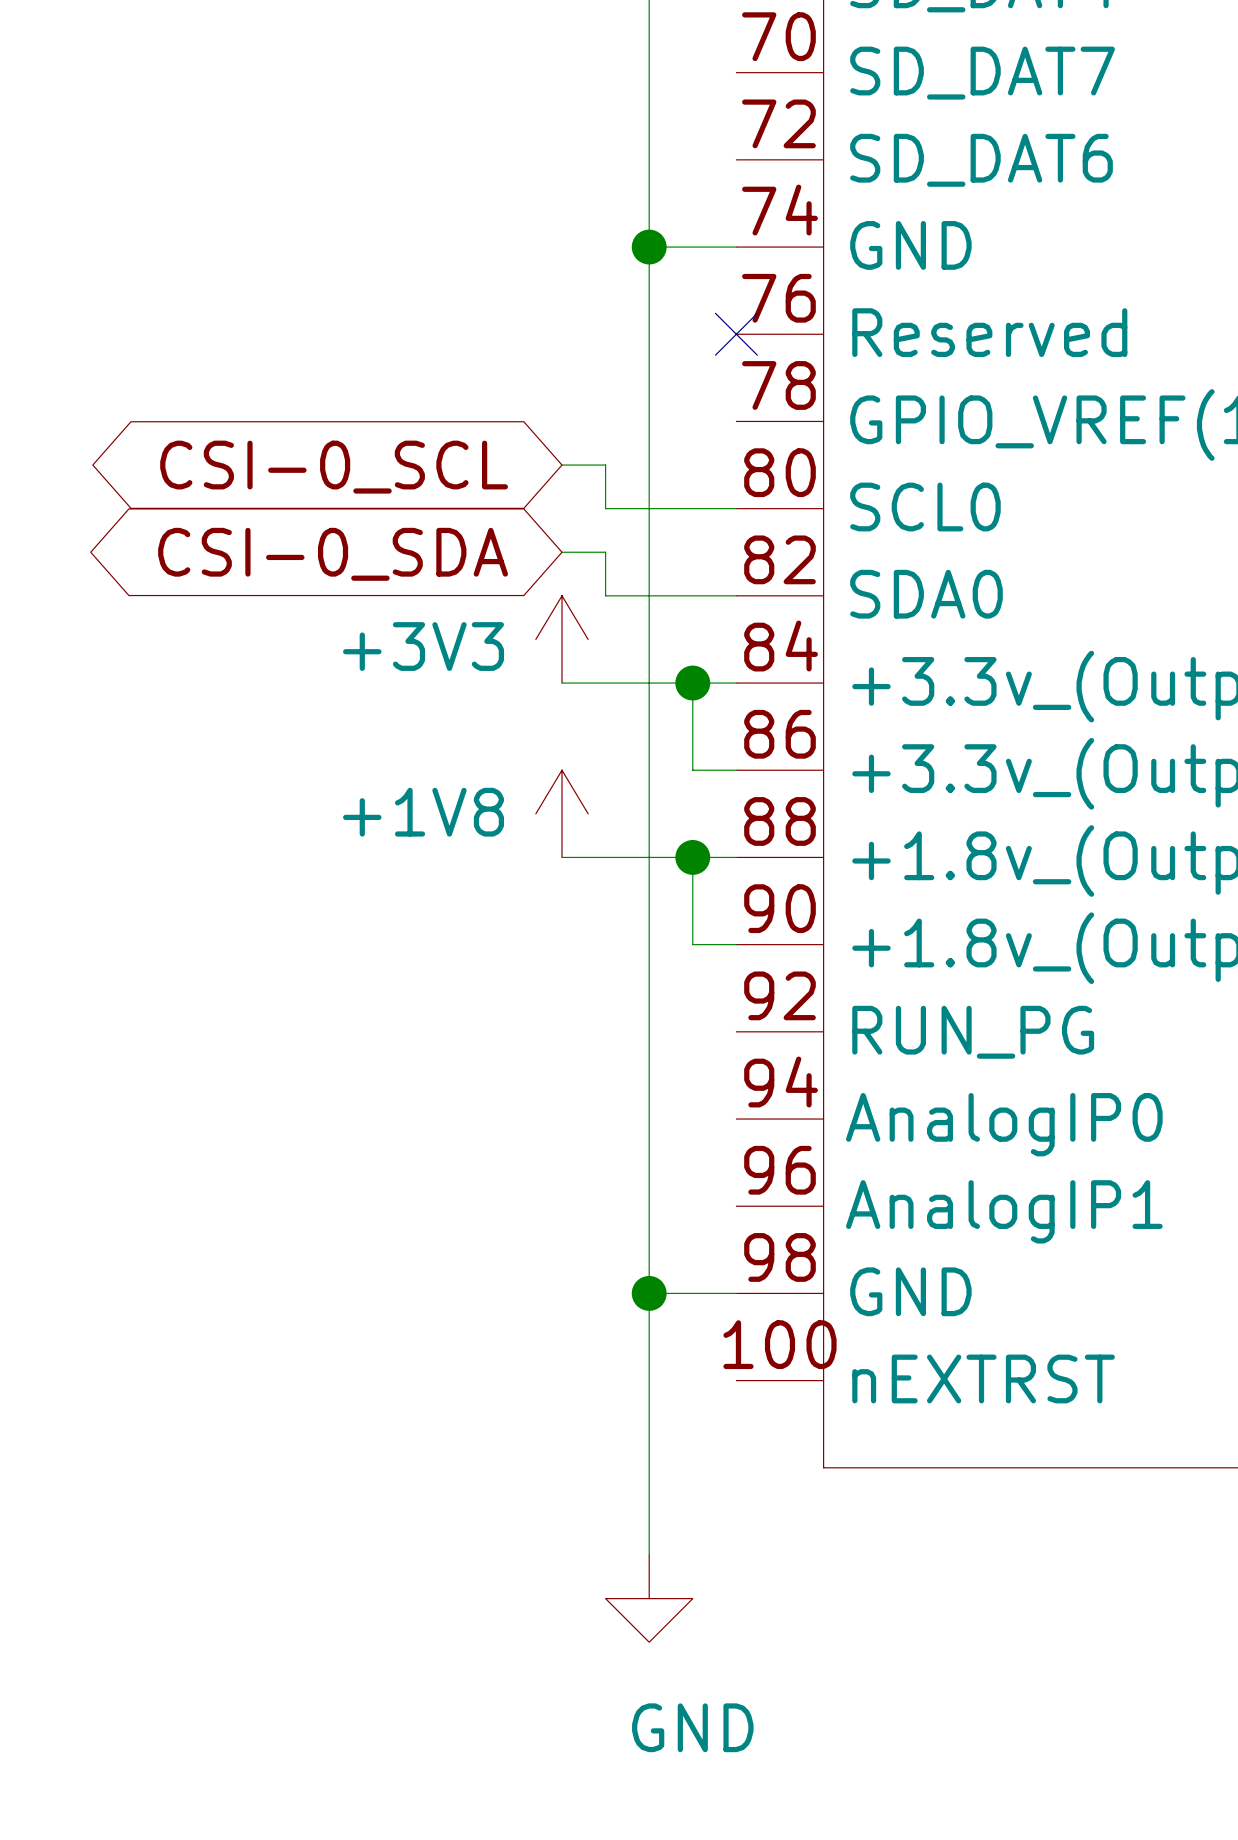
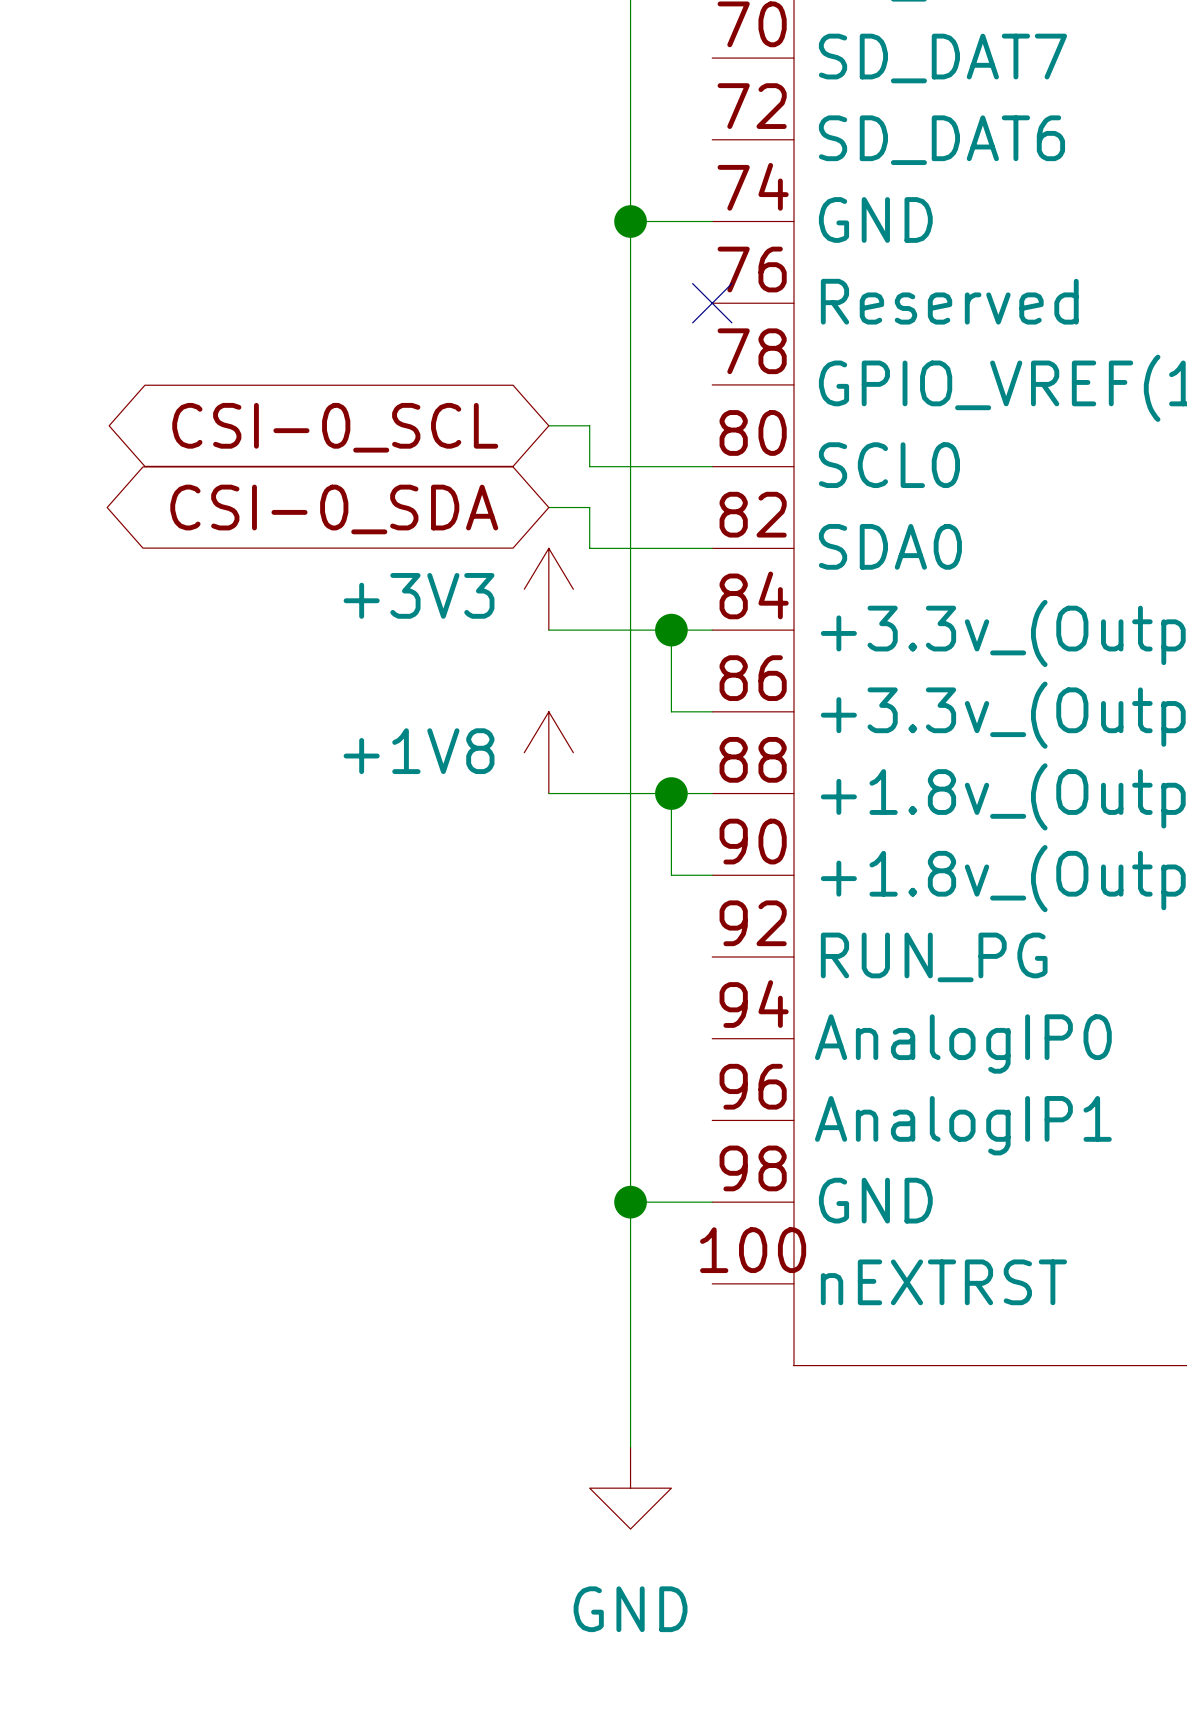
power symbol text position: GND (692, 1727) -> GND (630, 1609)

